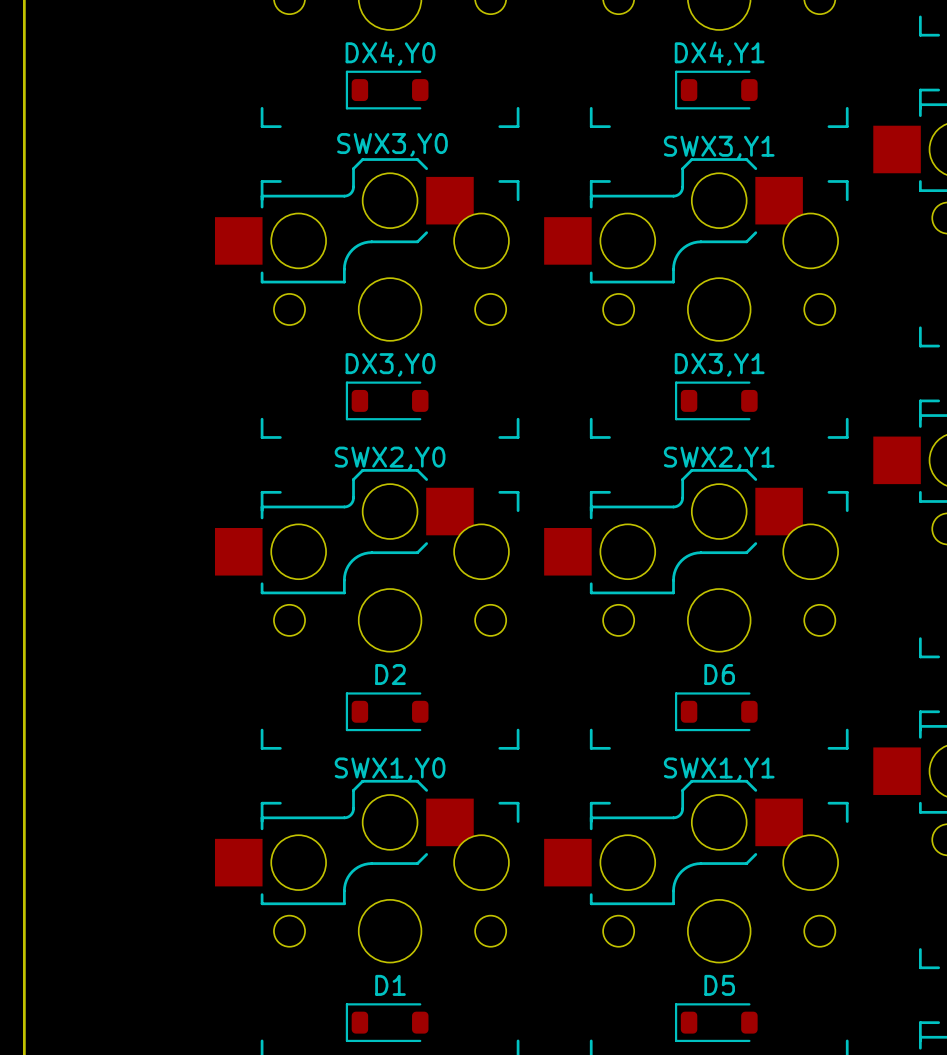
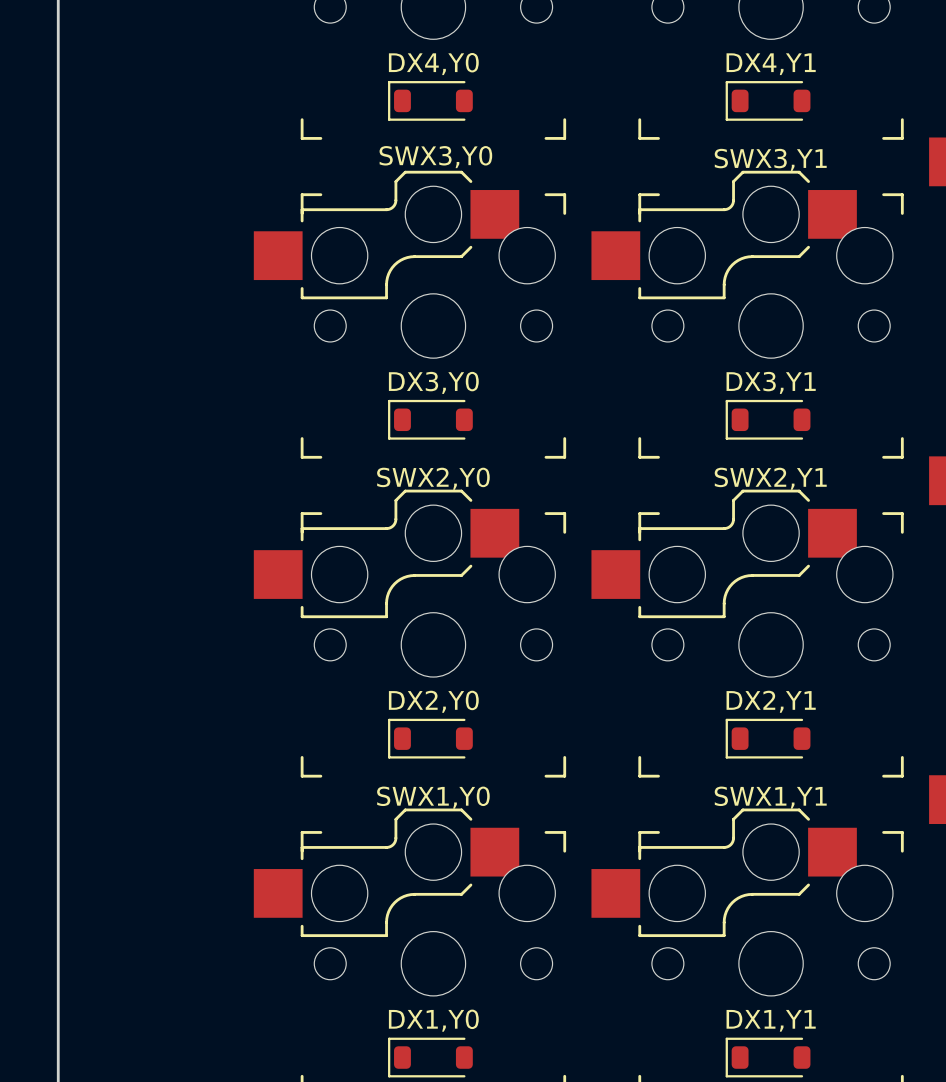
D2 name: D2 (390, 674) -> DX2,Y0 (433, 701)
D6 name: D6 (719, 674) -> DX2,Y1 (771, 701)
D1 name: D1 (390, 985) -> DX1,Y0 (433, 1020)
D5 name: D5 (719, 985) -> DX1,Y1 (771, 1020)

